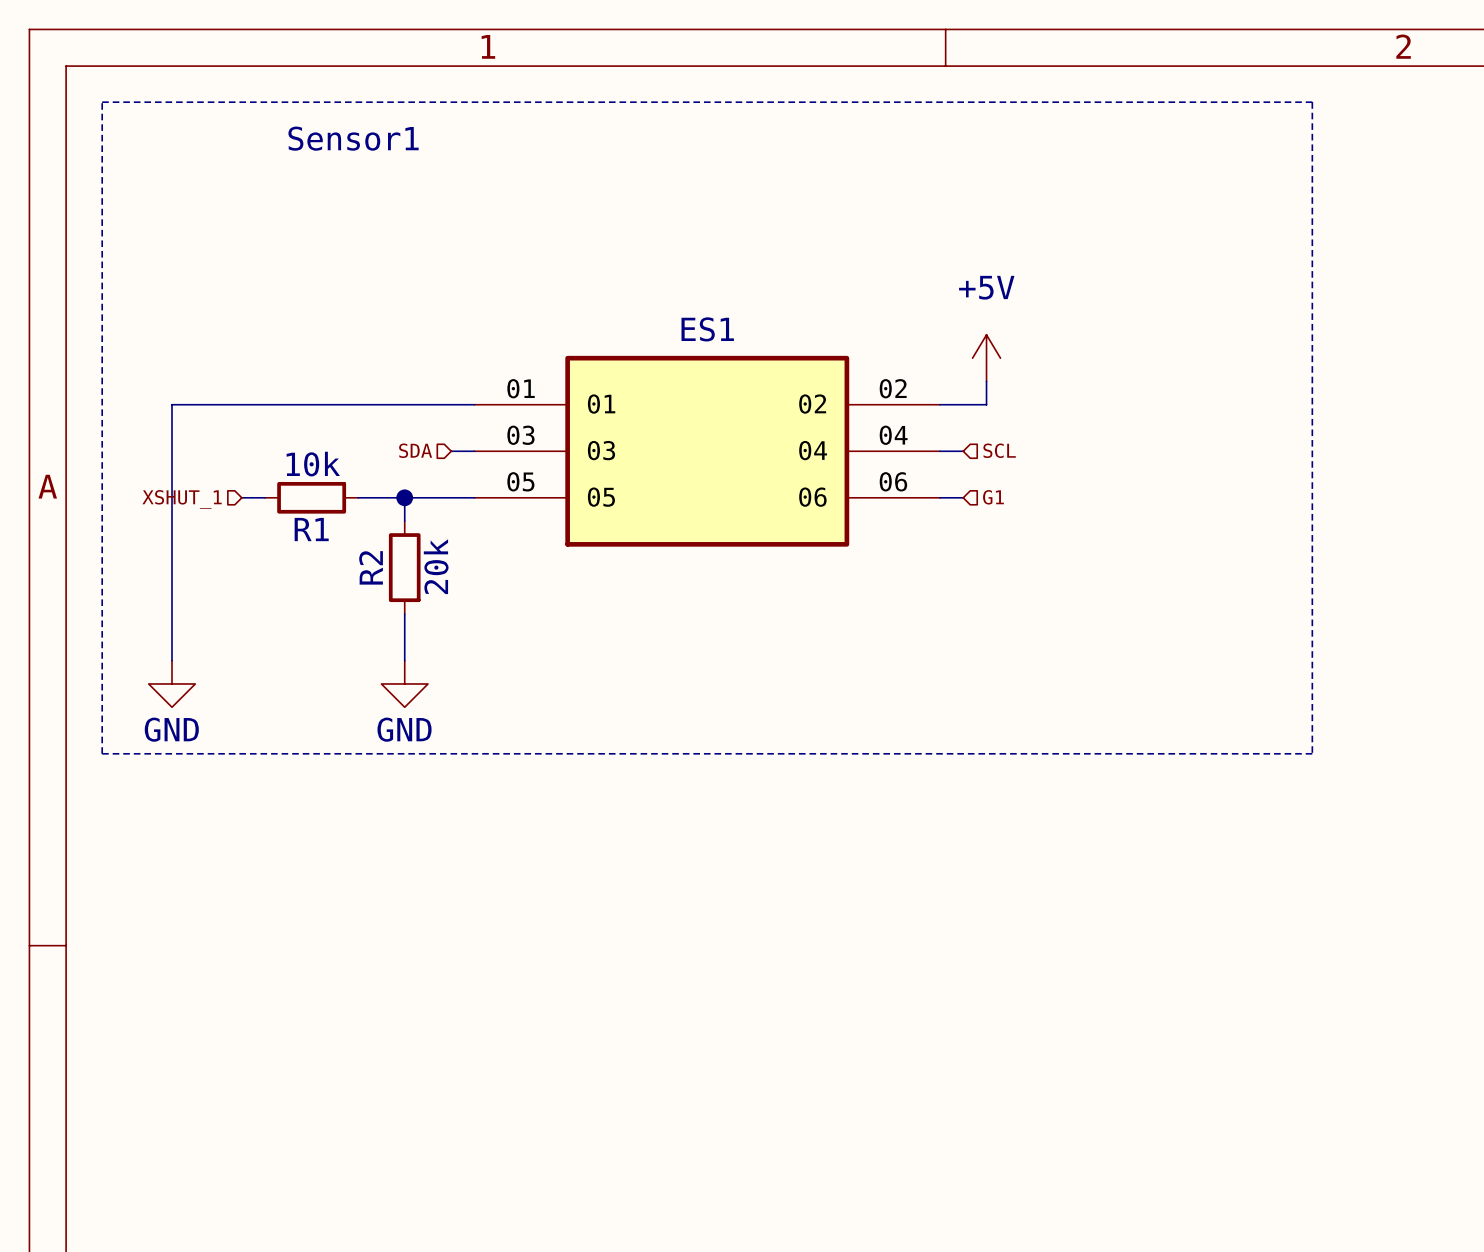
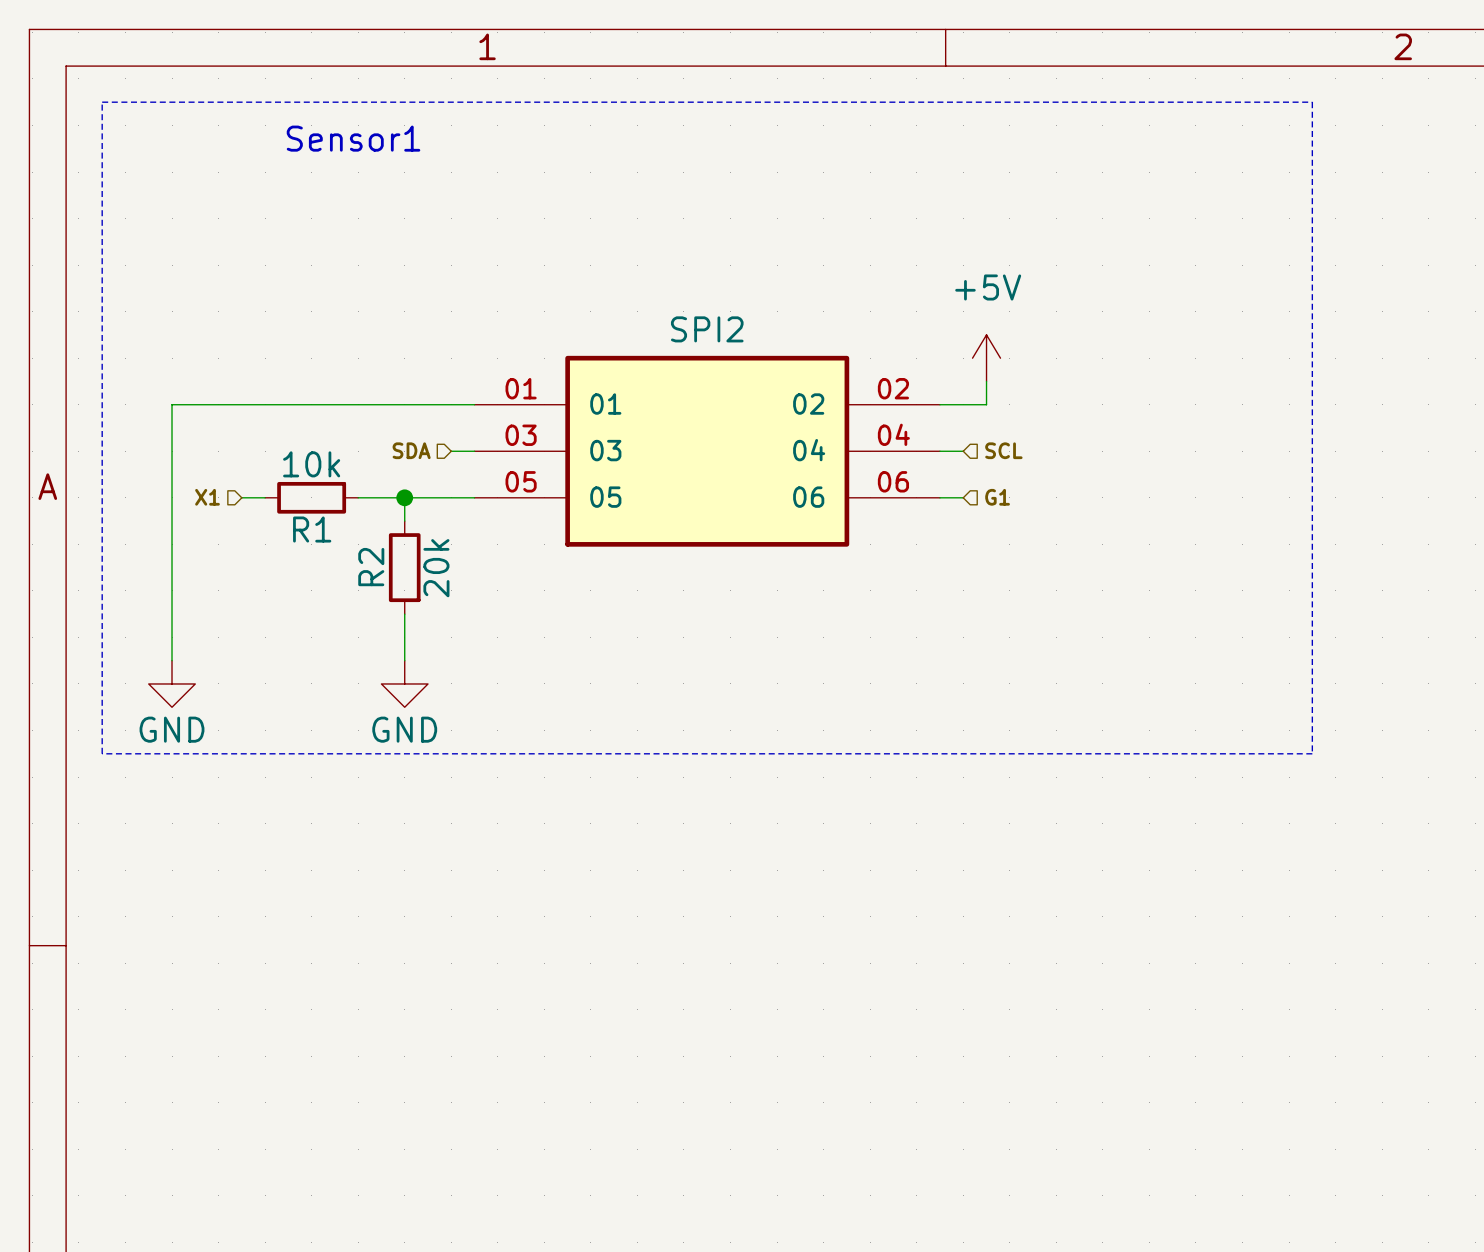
ES1 name: ES1 (707, 329) -> SPI2 (707, 329)
hierarchical label: XSHUT_1 (182, 499) -> X1 (207, 497)

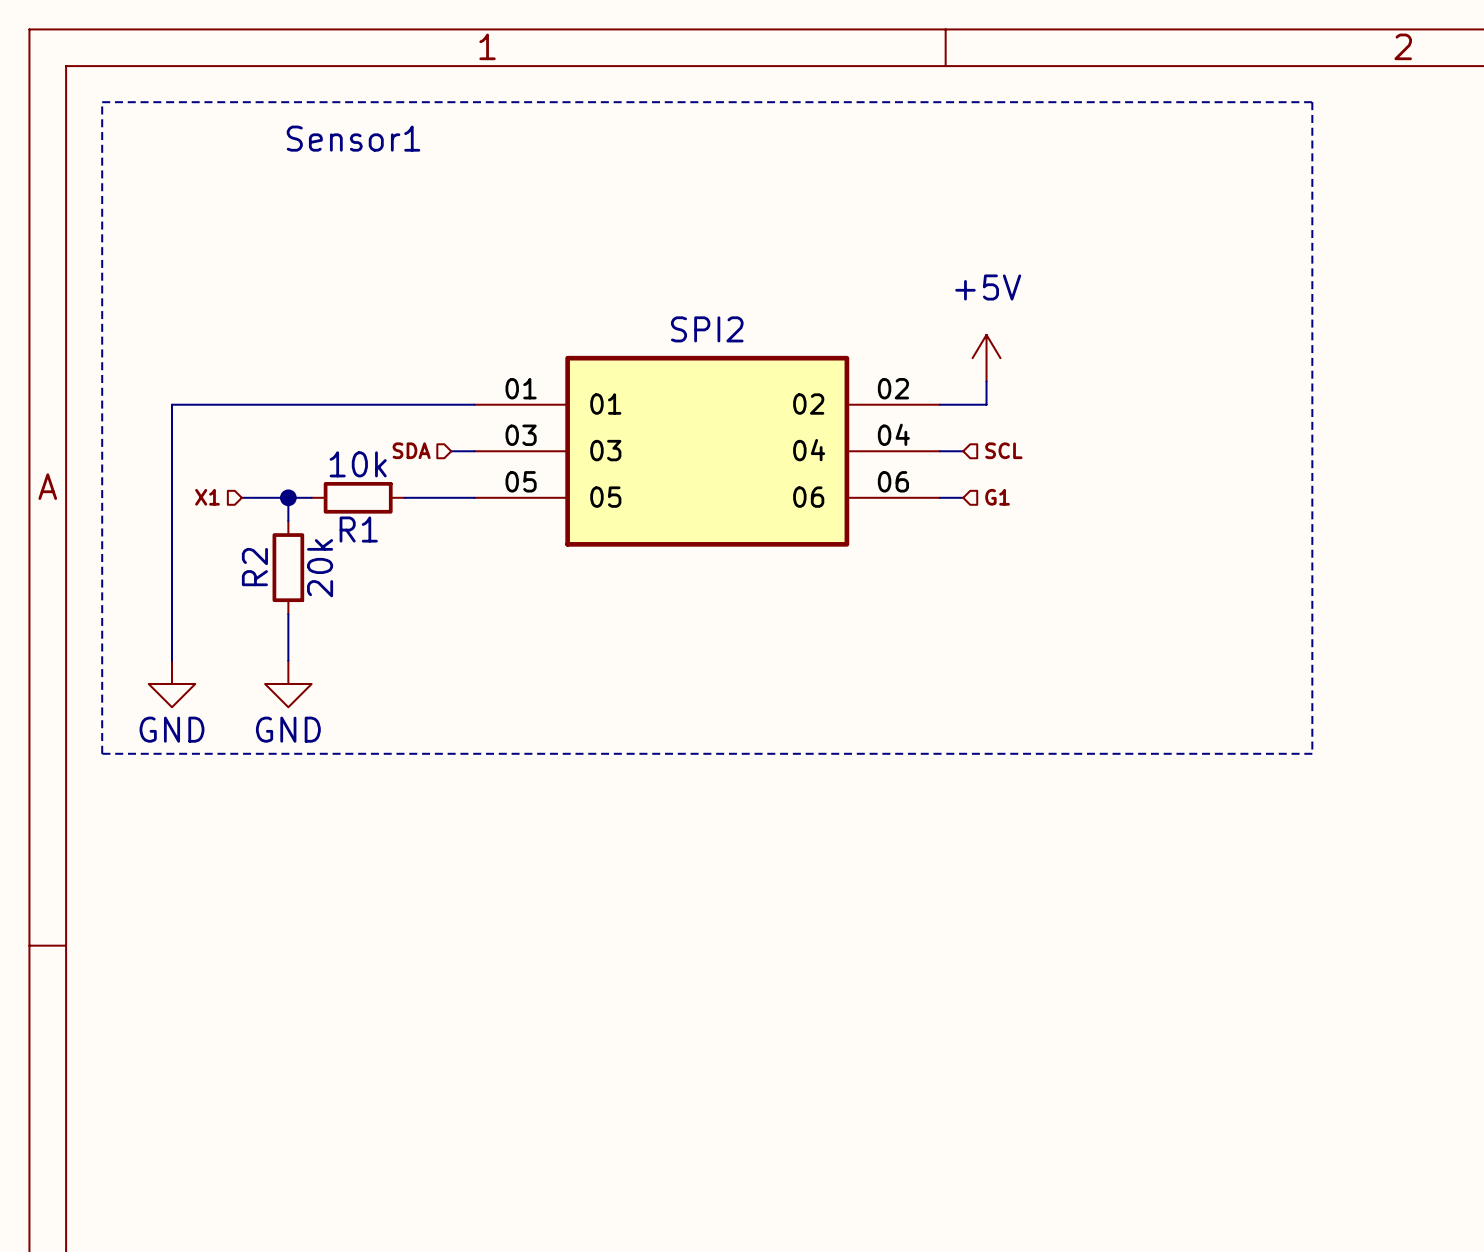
wire: none -> (265, 497) (311, 497)
wire: none -> (288, 497) (288, 521)
junction: none -> (288, 497)
R1 position: (311, 497) -> (358, 497)
wire: (358, 497) (404, 497) (404, 521) -> none
junction: (404, 497) -> none
R2 position: (404, 567) -> (288, 567)
wire: (404, 614) (404, 660) -> (288, 614) (288, 660)
power symbol position: GND (404, 683) -> GND (288, 683)

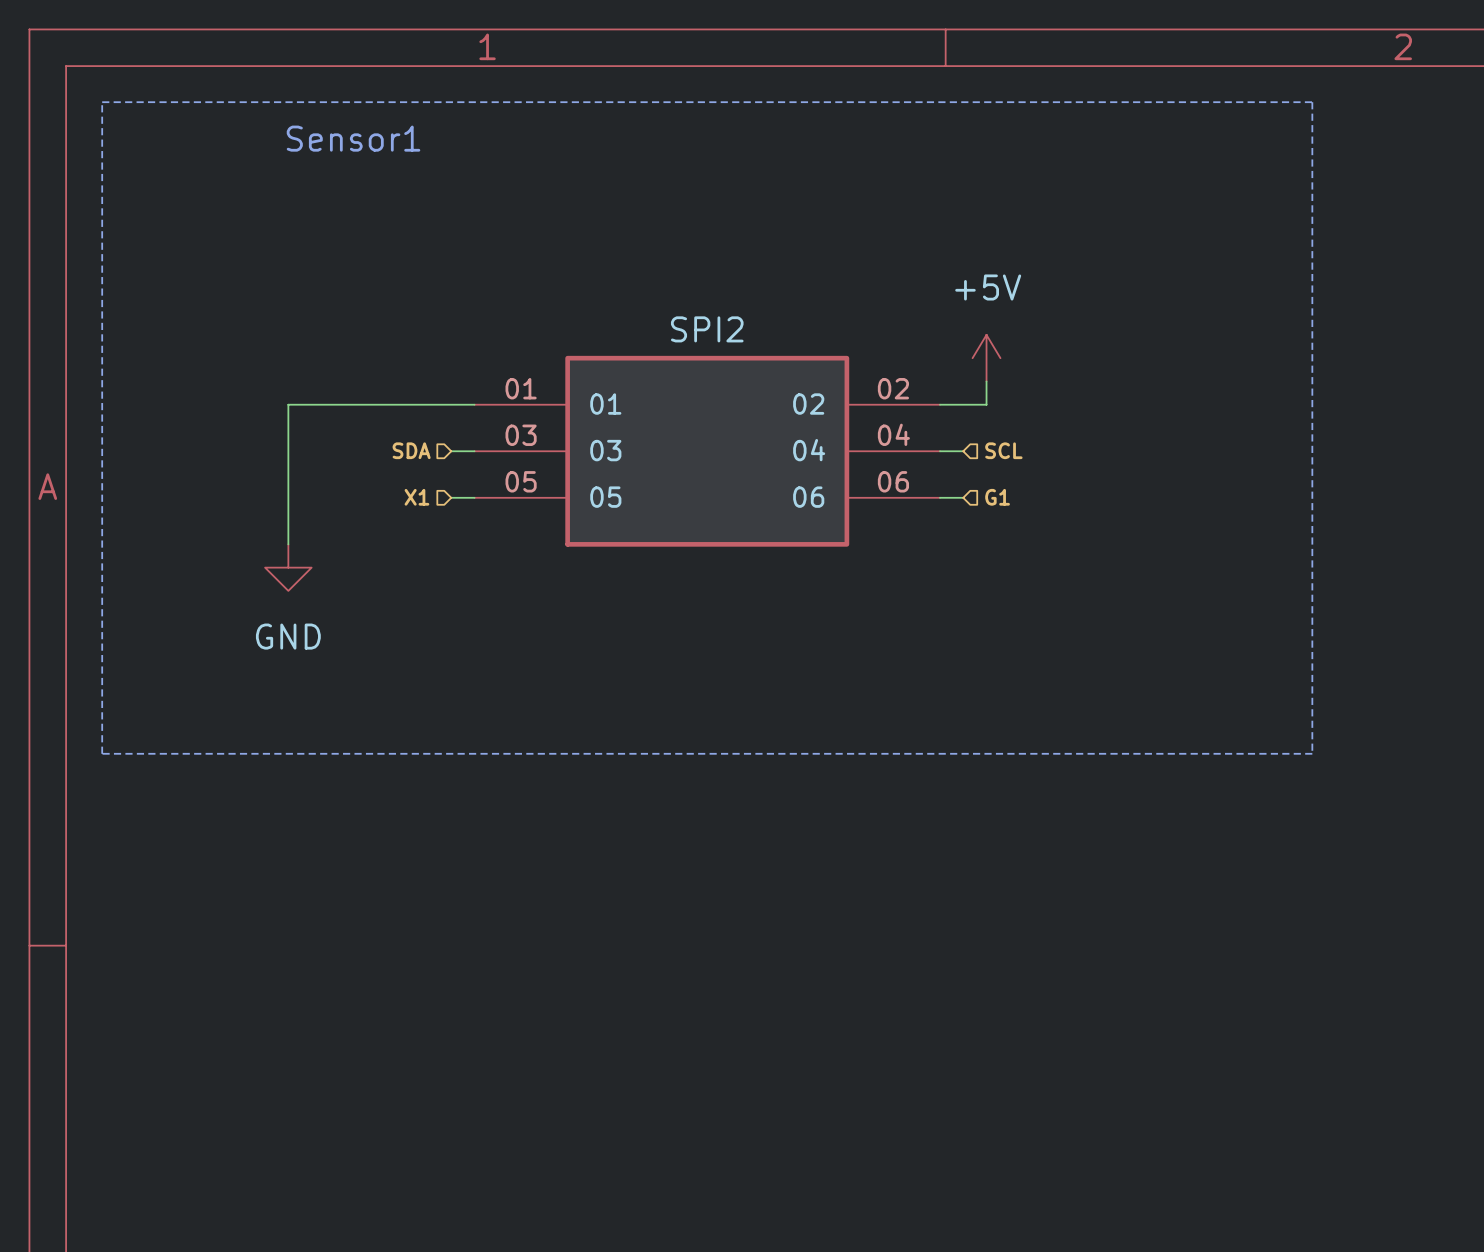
wire: (288, 404) (172, 404) (172, 660) -> (288, 404) (288, 497)
hierarchical label position: X1 (207, 497) -> X1 (416, 497)
wire: (241, 497) (311, 497) -> none
junction: (288, 497) -> none
R1: 10k (358, 497) -> none
wire: (404, 497) (451, 497) -> none
R2: 20k (288, 567) -> none
power symbol: none -> GND (288, 567)
wire: (288, 614) (288, 660) -> none
power symbol: GND (172, 683) -> none
power symbol: GND (288, 683) -> none

